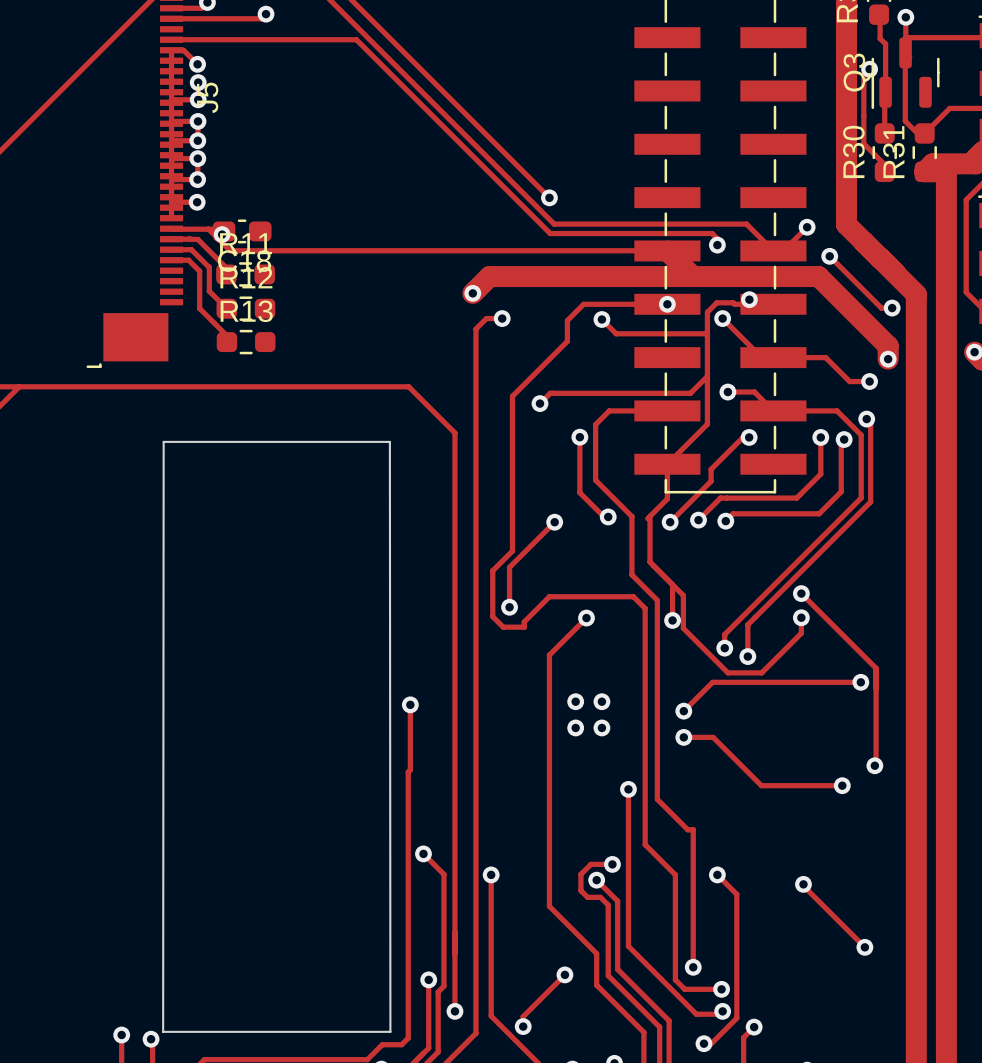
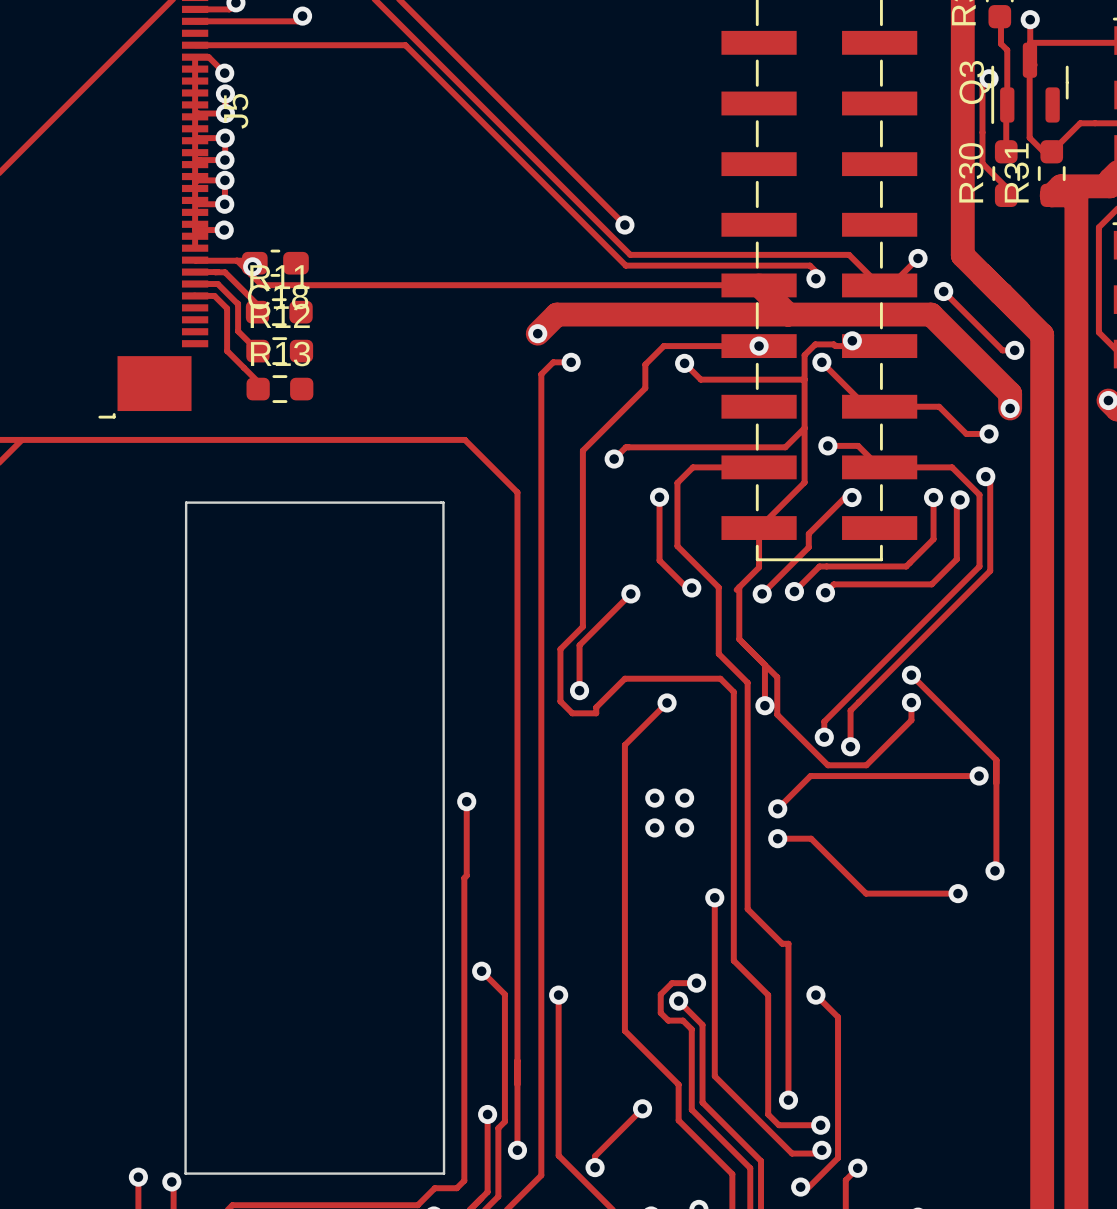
track: (803, 884) (864, 947) -> none
via: (803, 884) -> none
via: (864, 947) -> none

